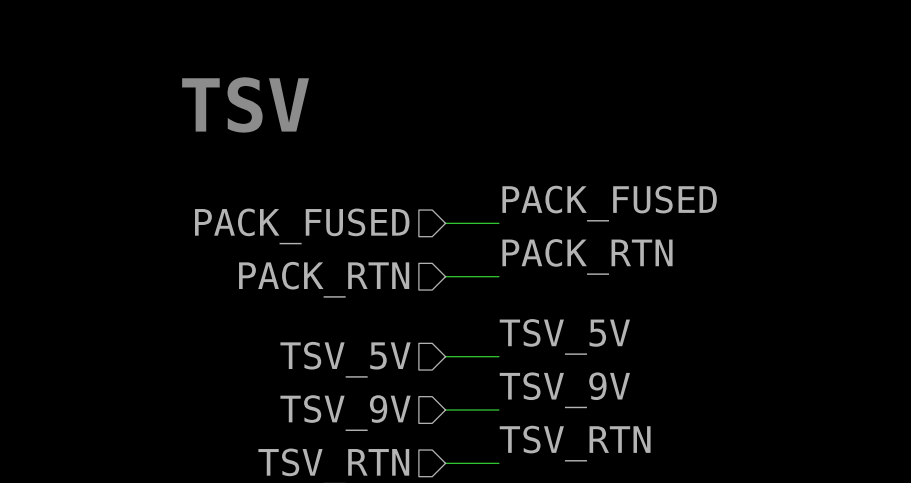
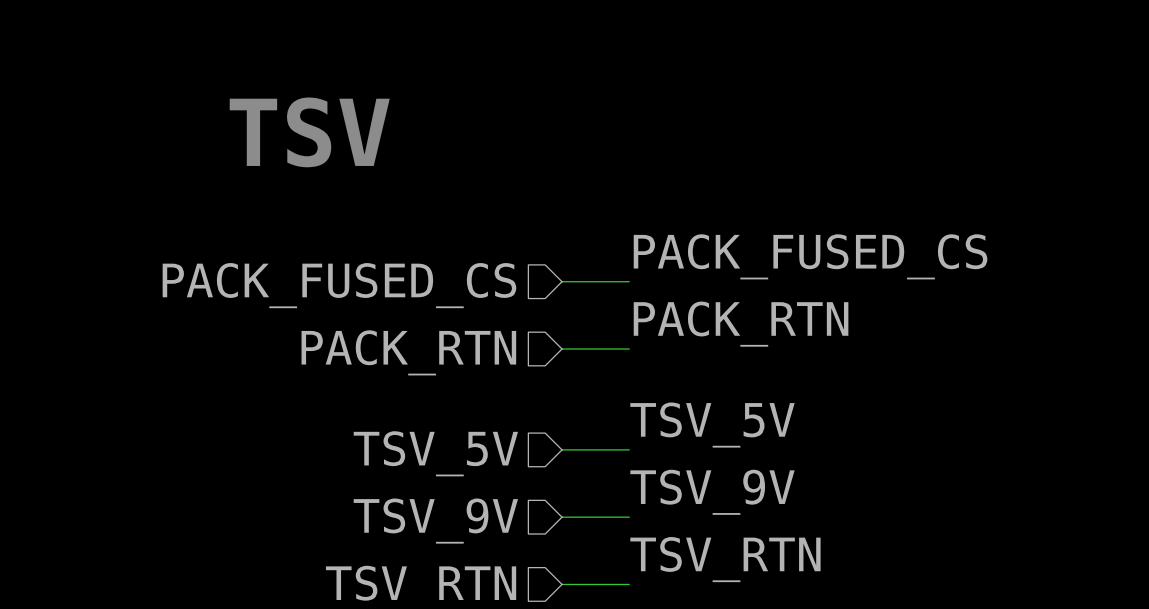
label: PACK_FUSED (609, 203) -> PACK_FUSED_CS (810, 256)
hierarchical label: PACK_FUSED (302, 226) -> PACK_FUSED_CS (339, 285)

